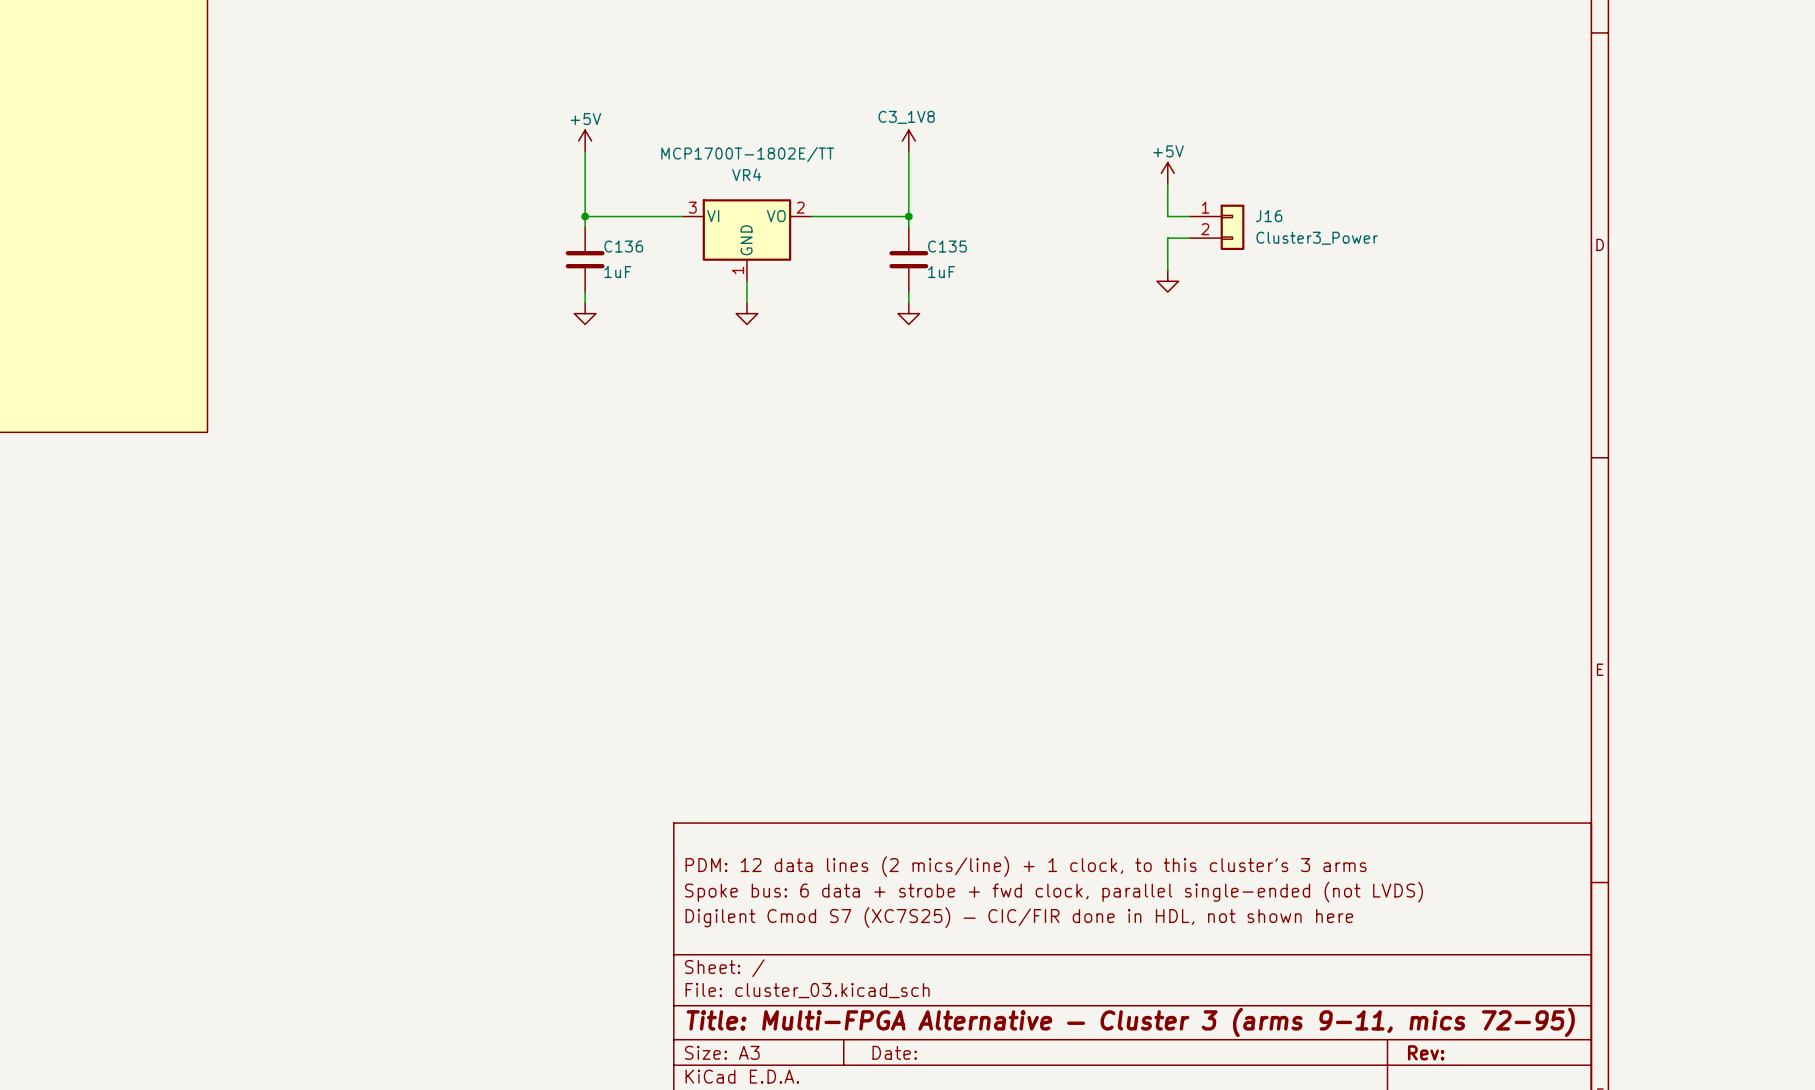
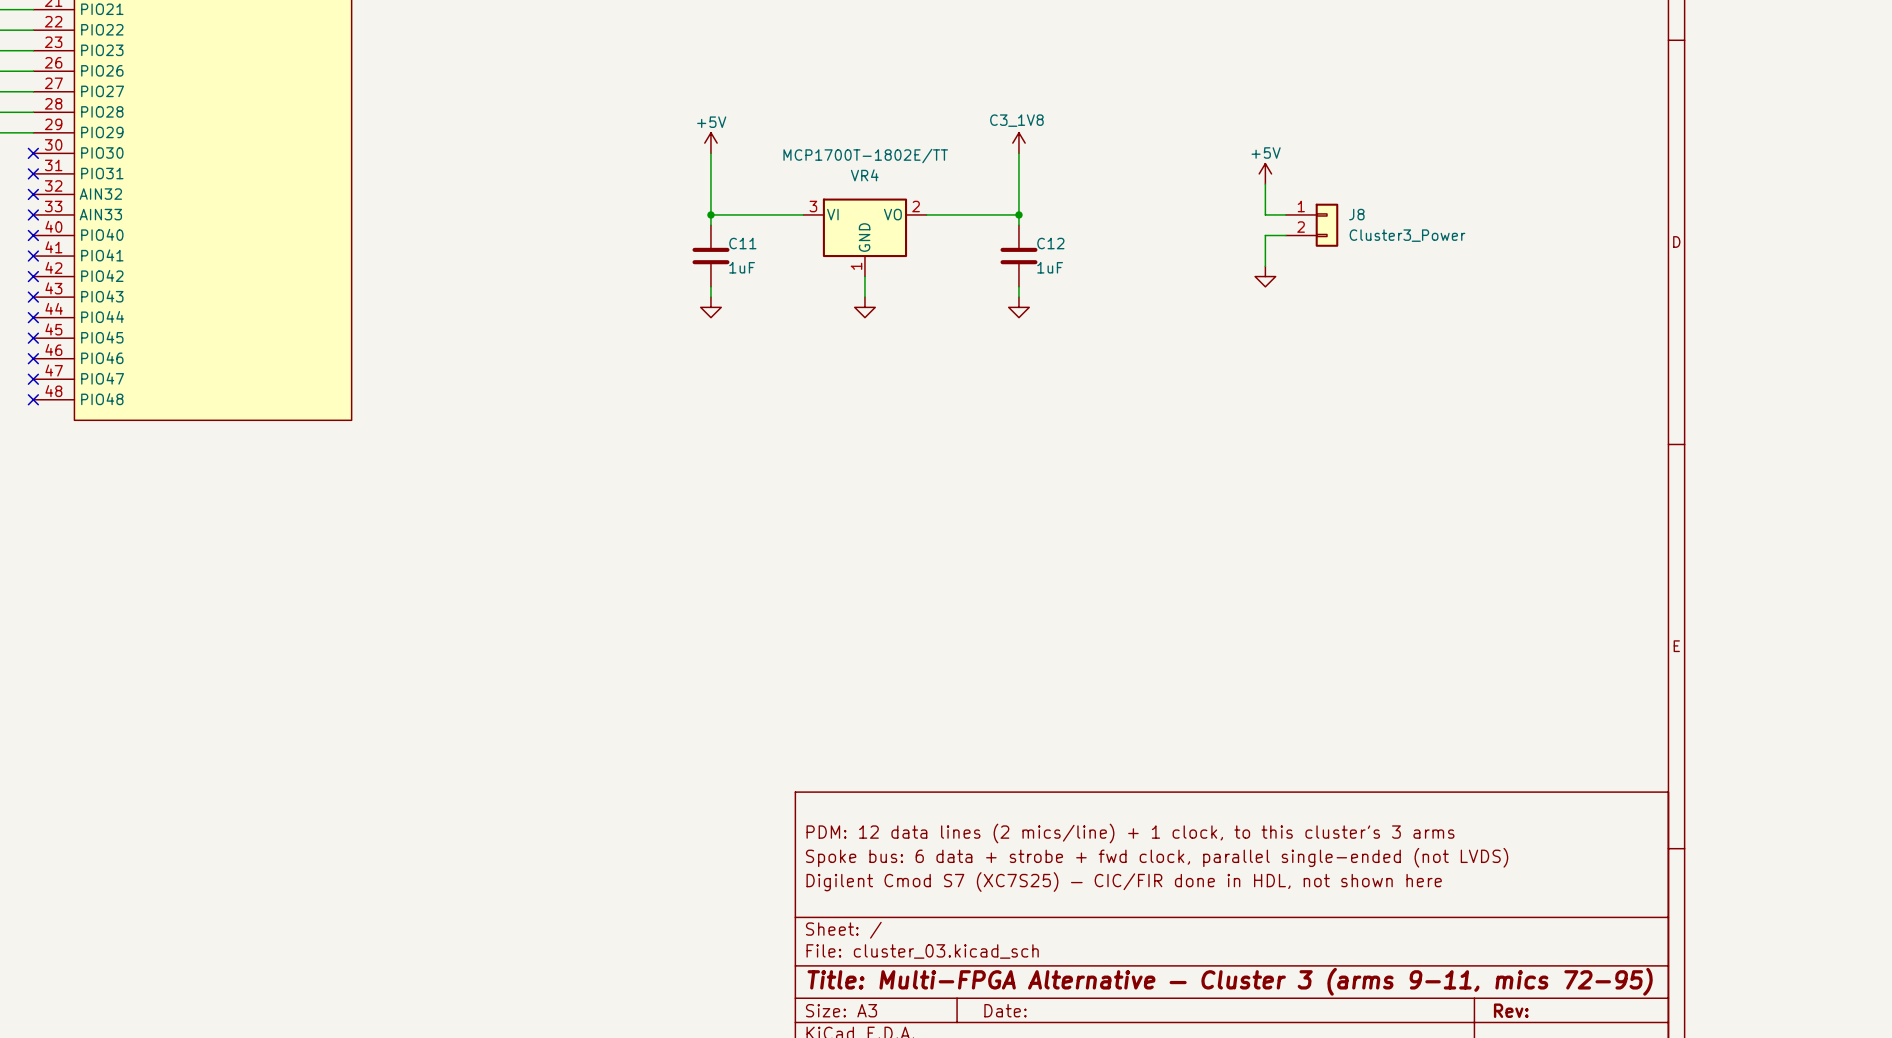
J16 name: J16 (1269, 216) -> J8 (1356, 214)
C136 name: C136 (623, 246) -> C11 (742, 243)
C135 name: C135 (947, 246) -> C12 (1050, 243)

